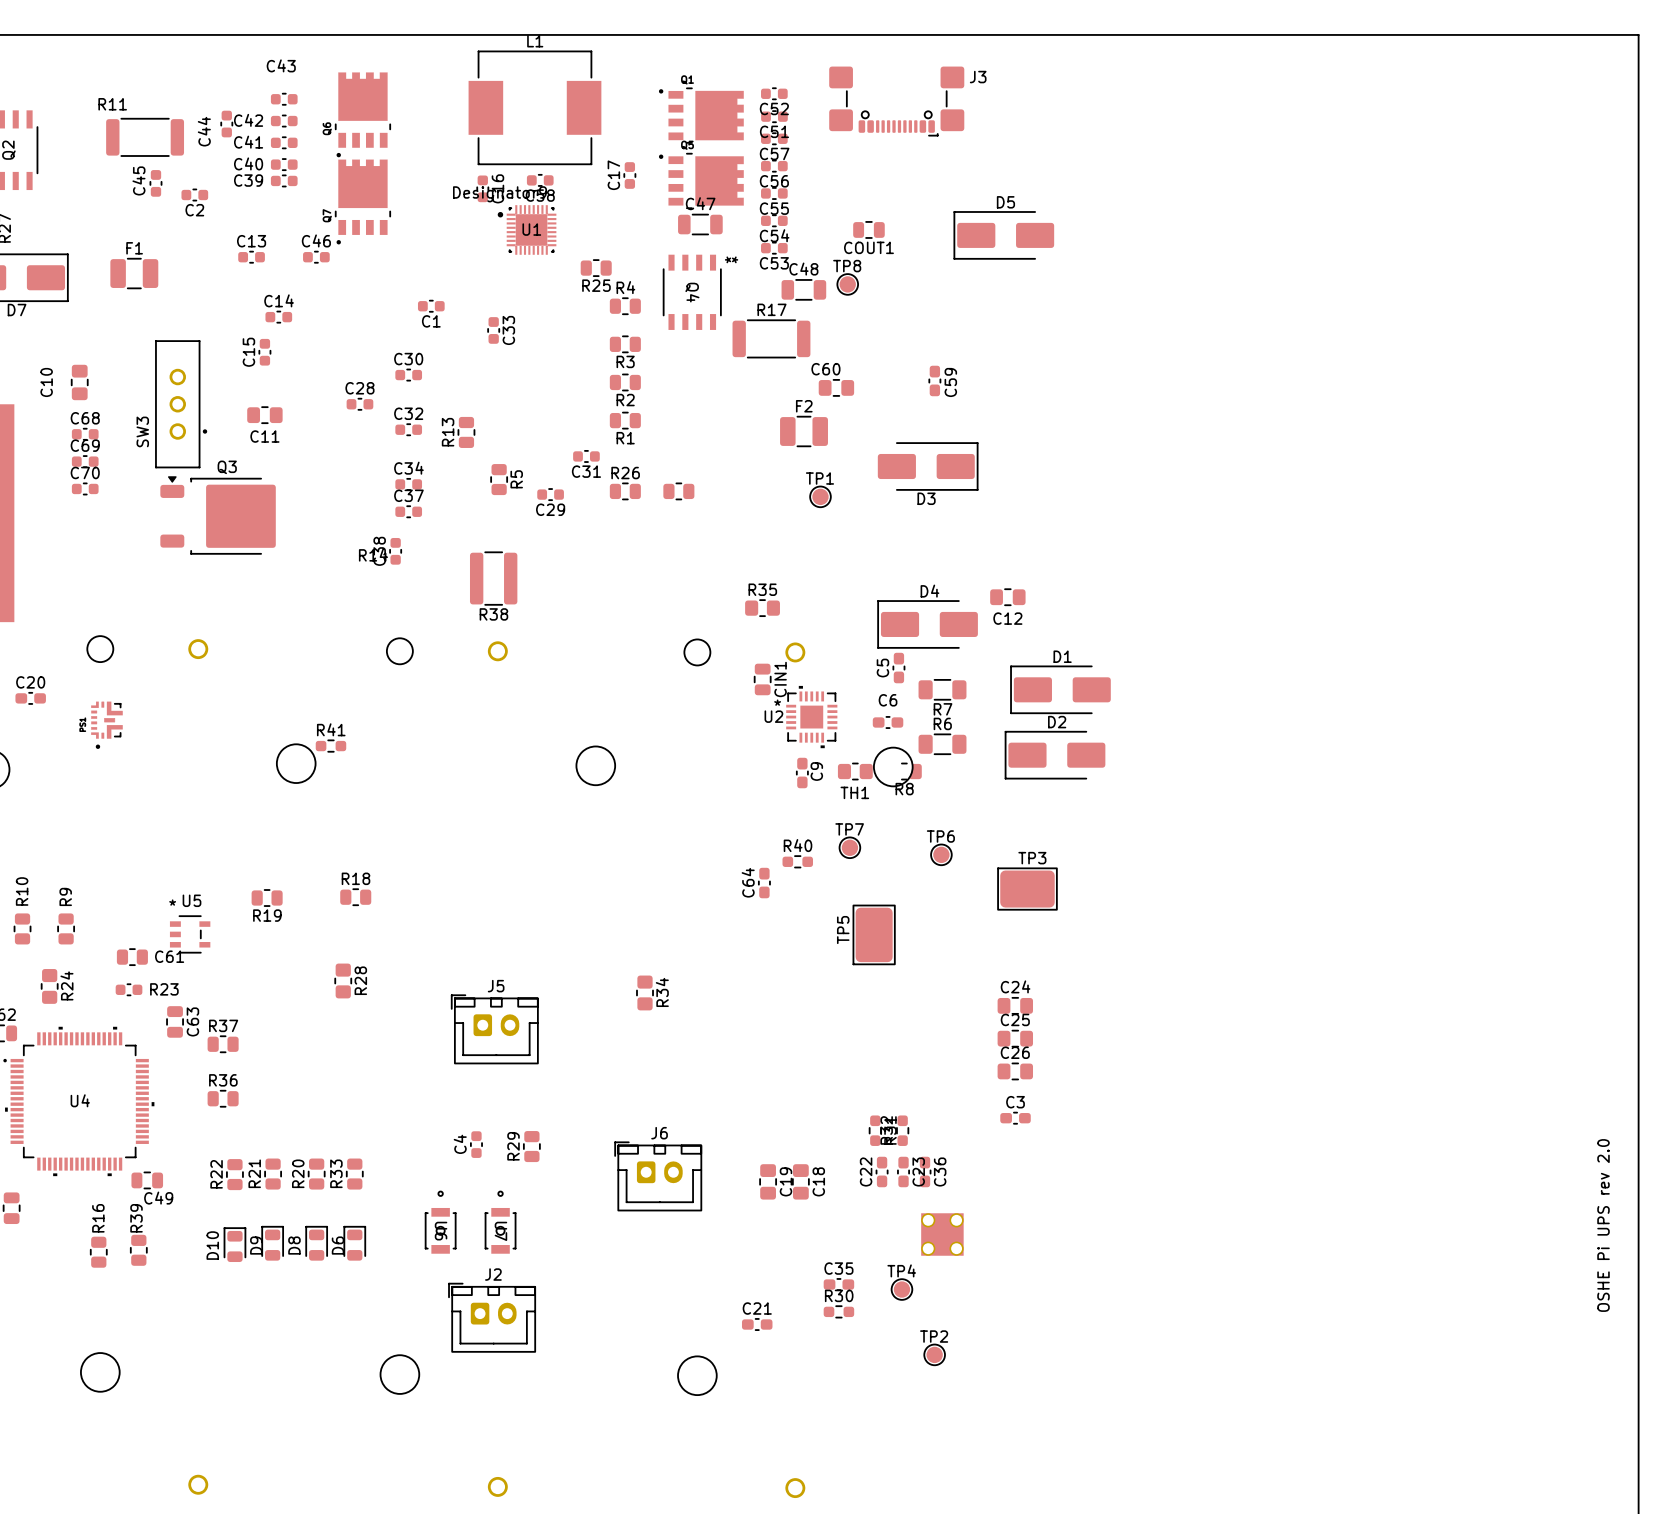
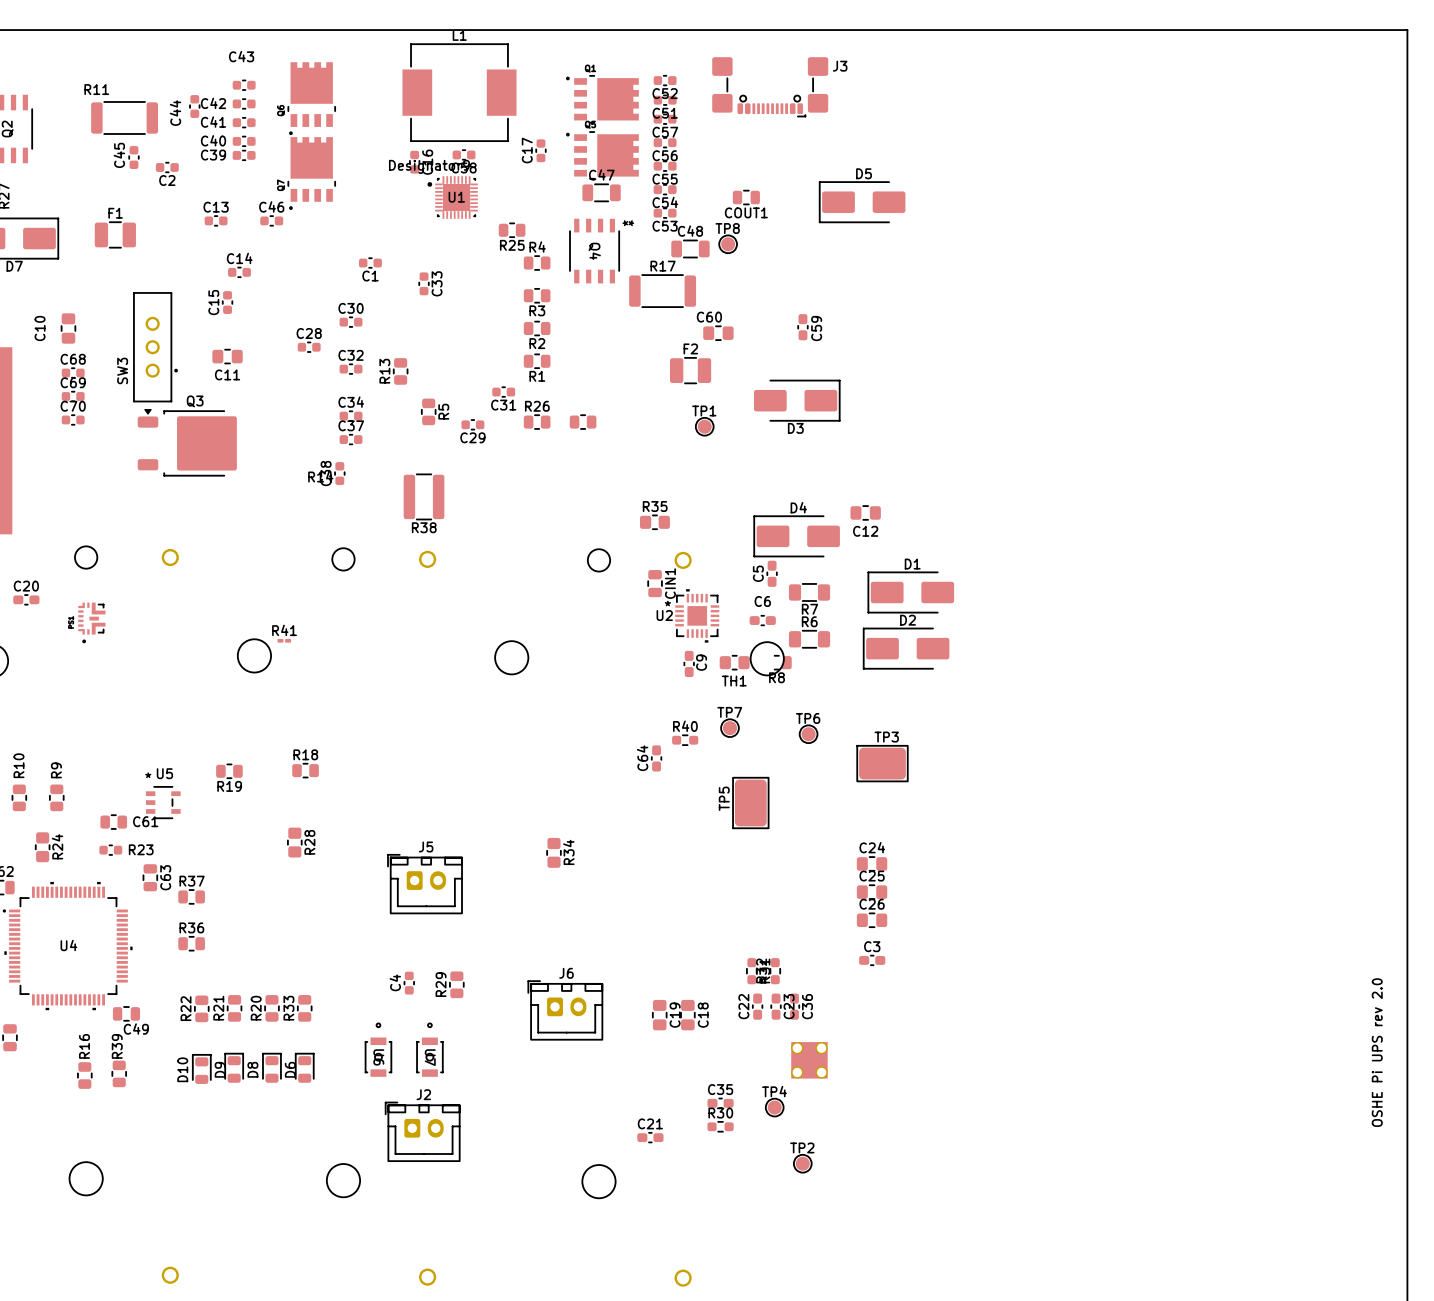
R41 footprint: [315, 739, 347, 753] -> [277, 638, 292, 643]

